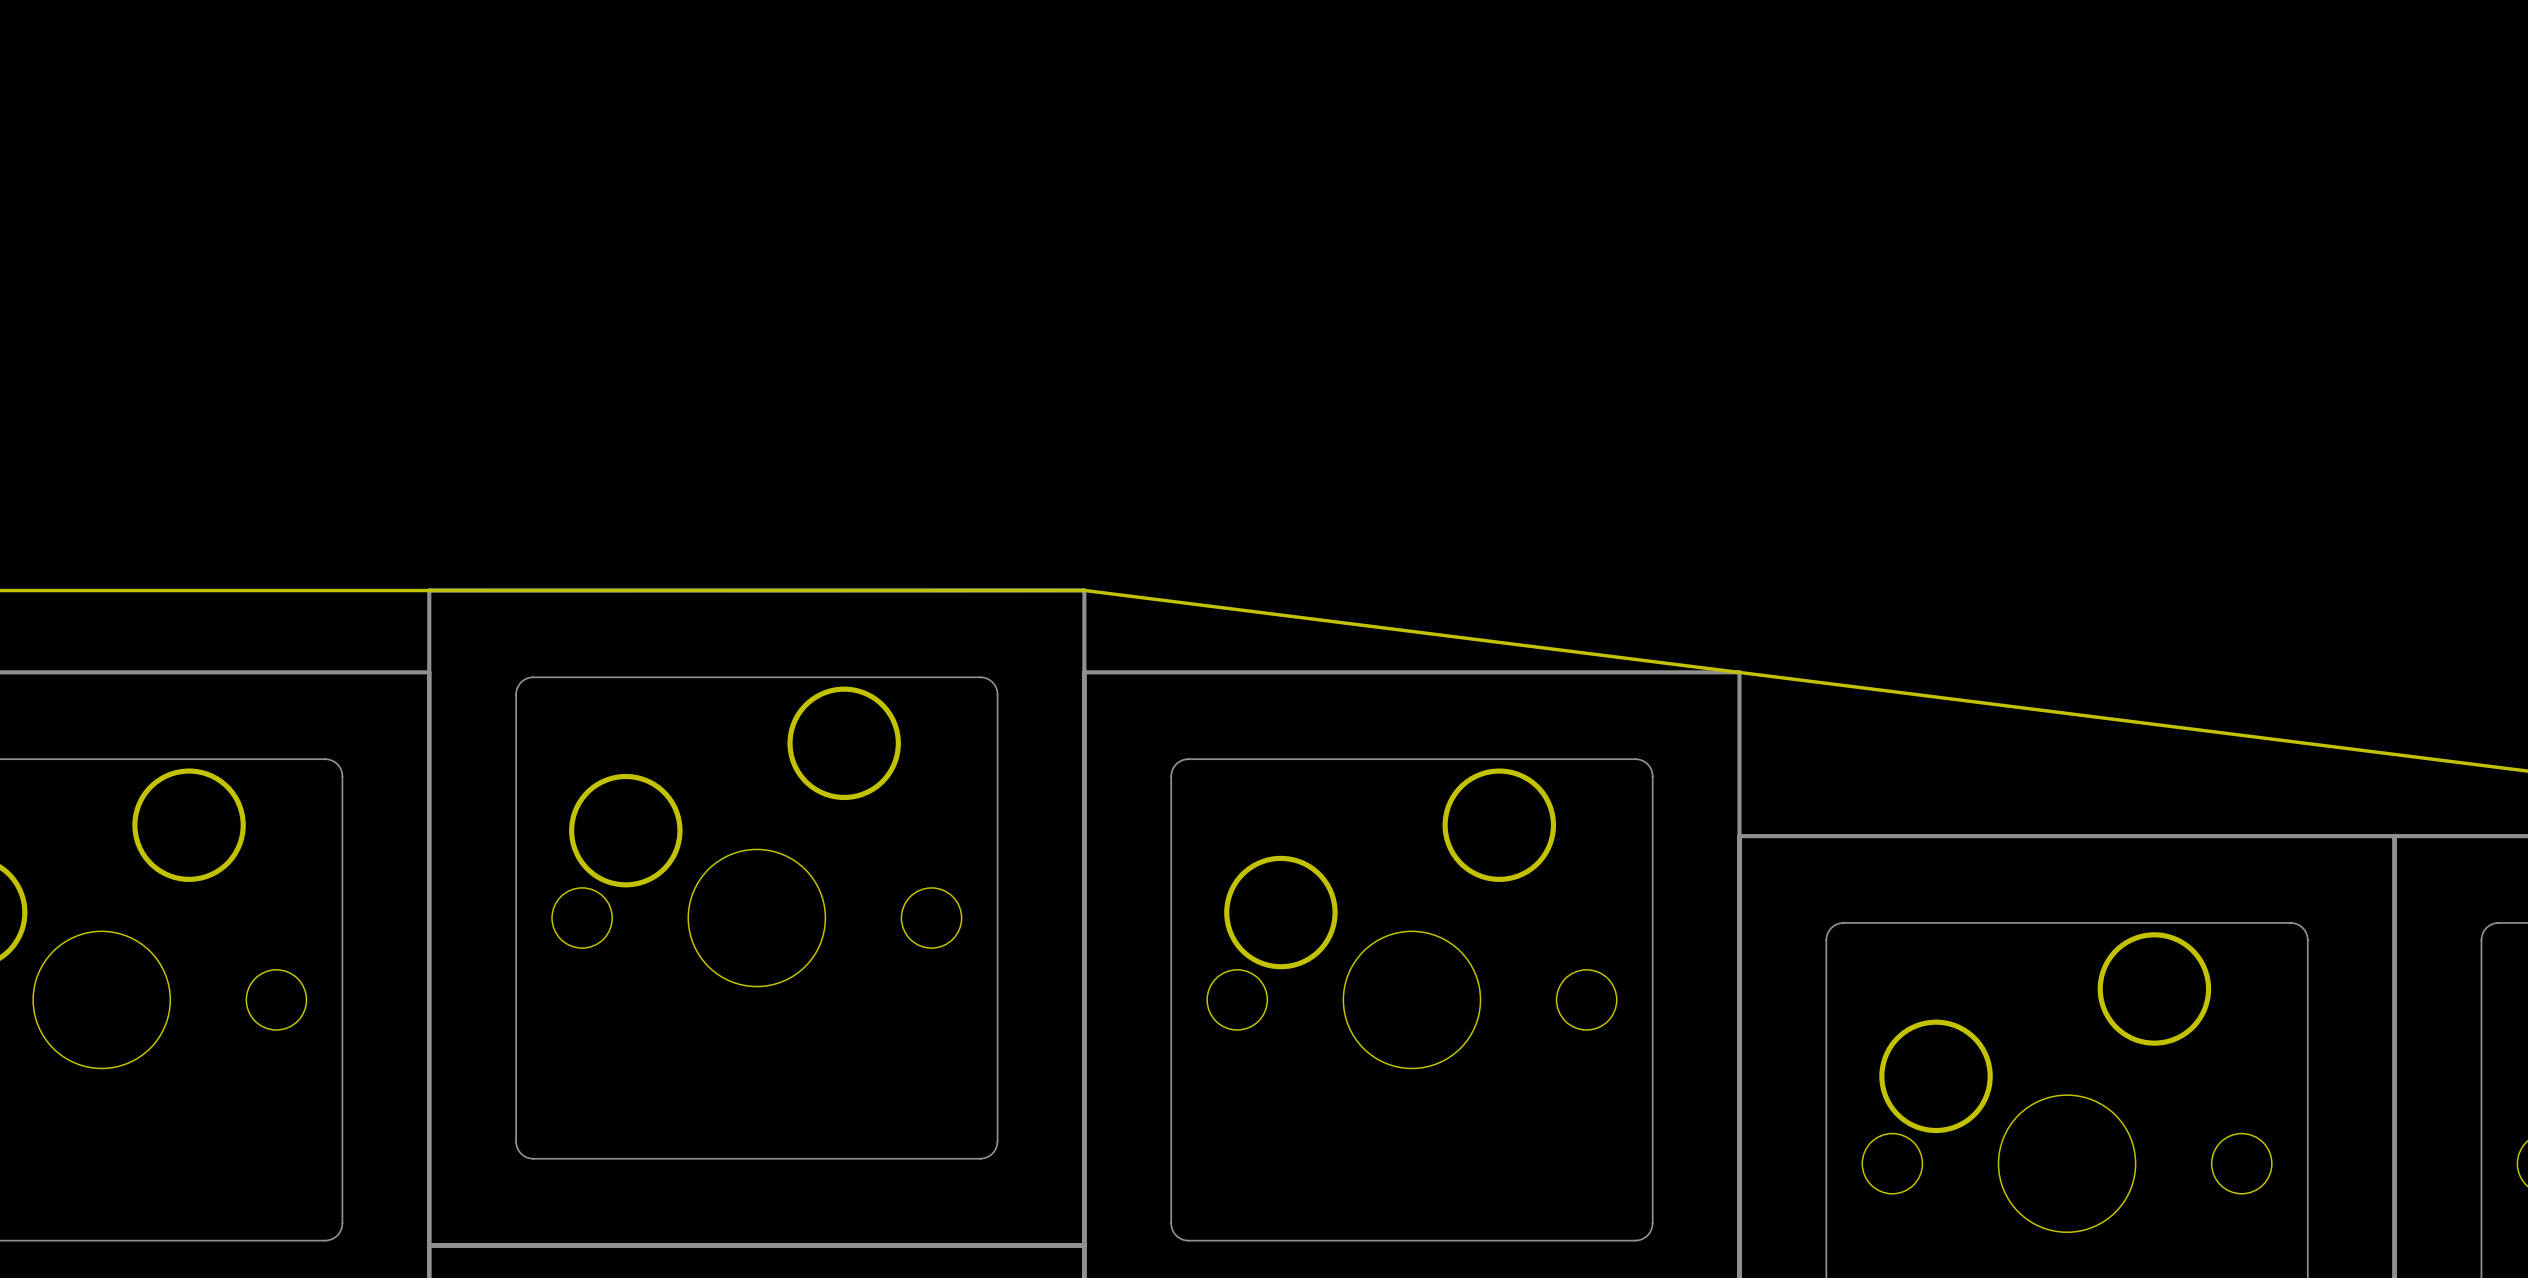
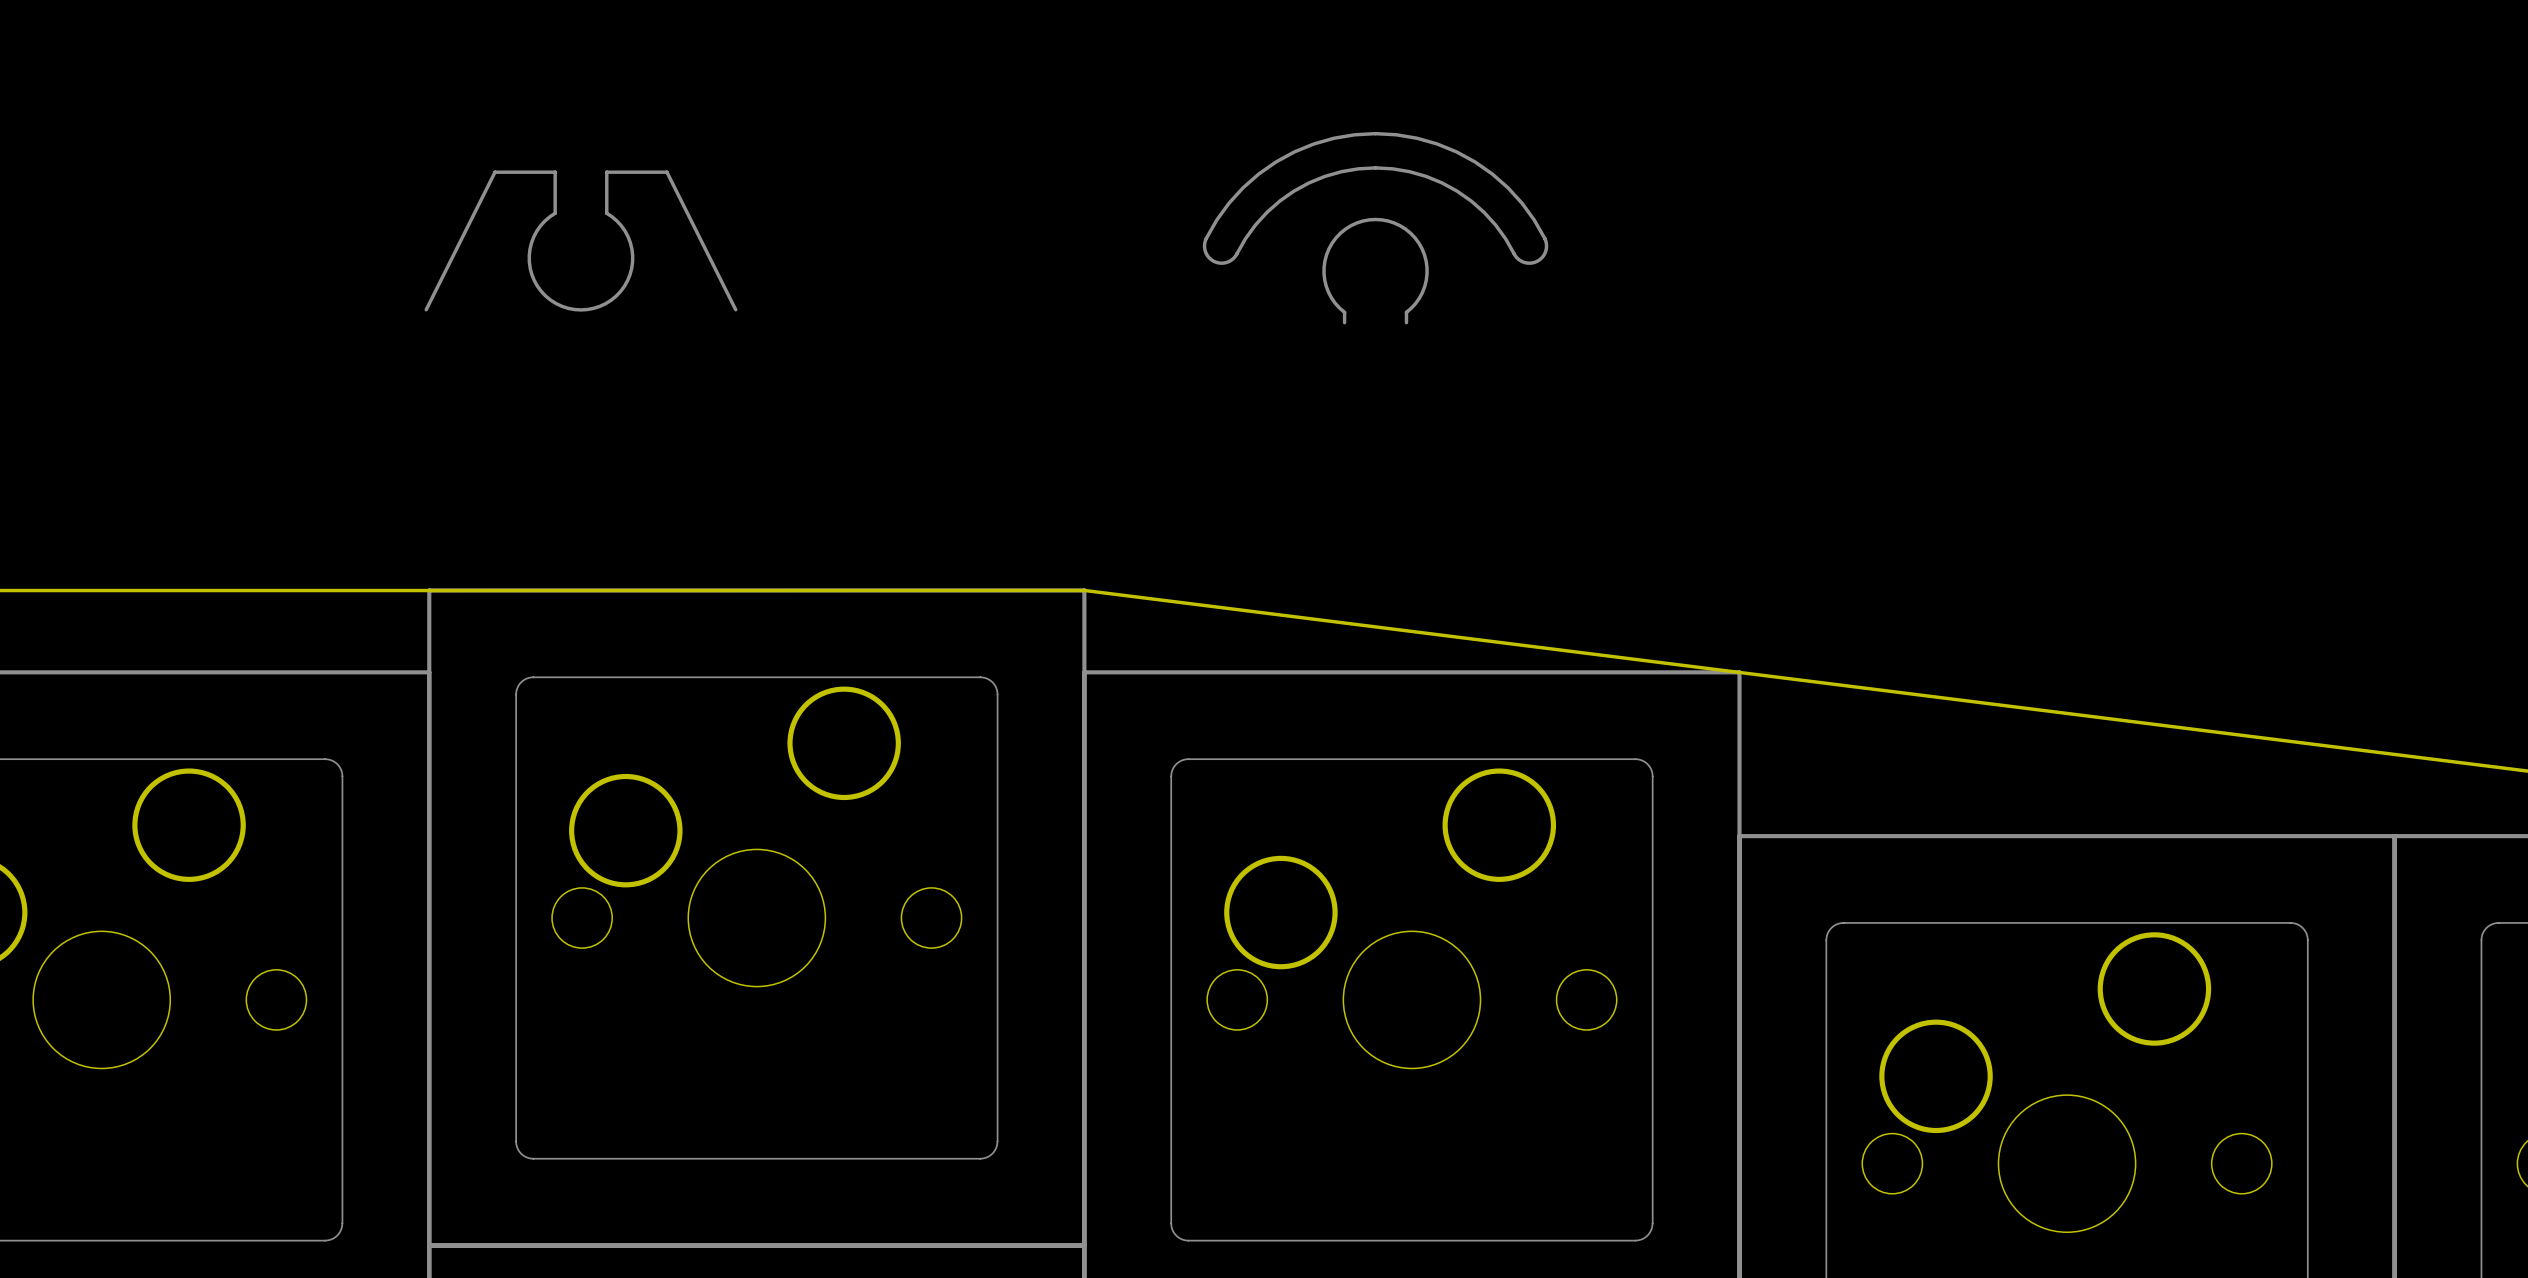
line: none -> (1375, 133) (1417, 138) (1437, 144) (1456, 151) (1492, 173) (1507, 187) (1534, 220) (1546, 242) (1543, 256) (1533, 262) (1519, 259) (1495, 224) (1483, 212) (1471, 200) (1441, 182) (1409, 171) (1375, 167) (1341, 171) (1309, 182) (1294, 191) (1267, 212) (1255, 224) (1231, 259) (1219, 263) (1207, 256) (1204, 242) (1216, 220) (1229, 203) (1258, 173) (1294, 151) (1313, 144) (1333, 138) (1375, 133)
line: none -> (426, 309) (494, 172) (555, 172) (555, 213) (540, 225) (533, 236) (529, 255) (530, 268) (534, 280) (545, 296) (562, 306) (580, 309) (599, 306) (616, 296) (627, 280) (631, 268) (632, 255) (628, 236) (617, 221) (606, 213) (606, 172) (666, 172) (735, 309)
line: none -> (1344, 322) (1344, 312) (1335, 303) (1326, 286) (1324, 267) (1326, 254) (1332, 243) (1345, 229) (1356, 223) (1375, 219) (1388, 221) (1405, 229) (1415, 237) (1424, 254) (1426, 267) (1424, 286) (1419, 298) (1406, 312) (1406, 322)

